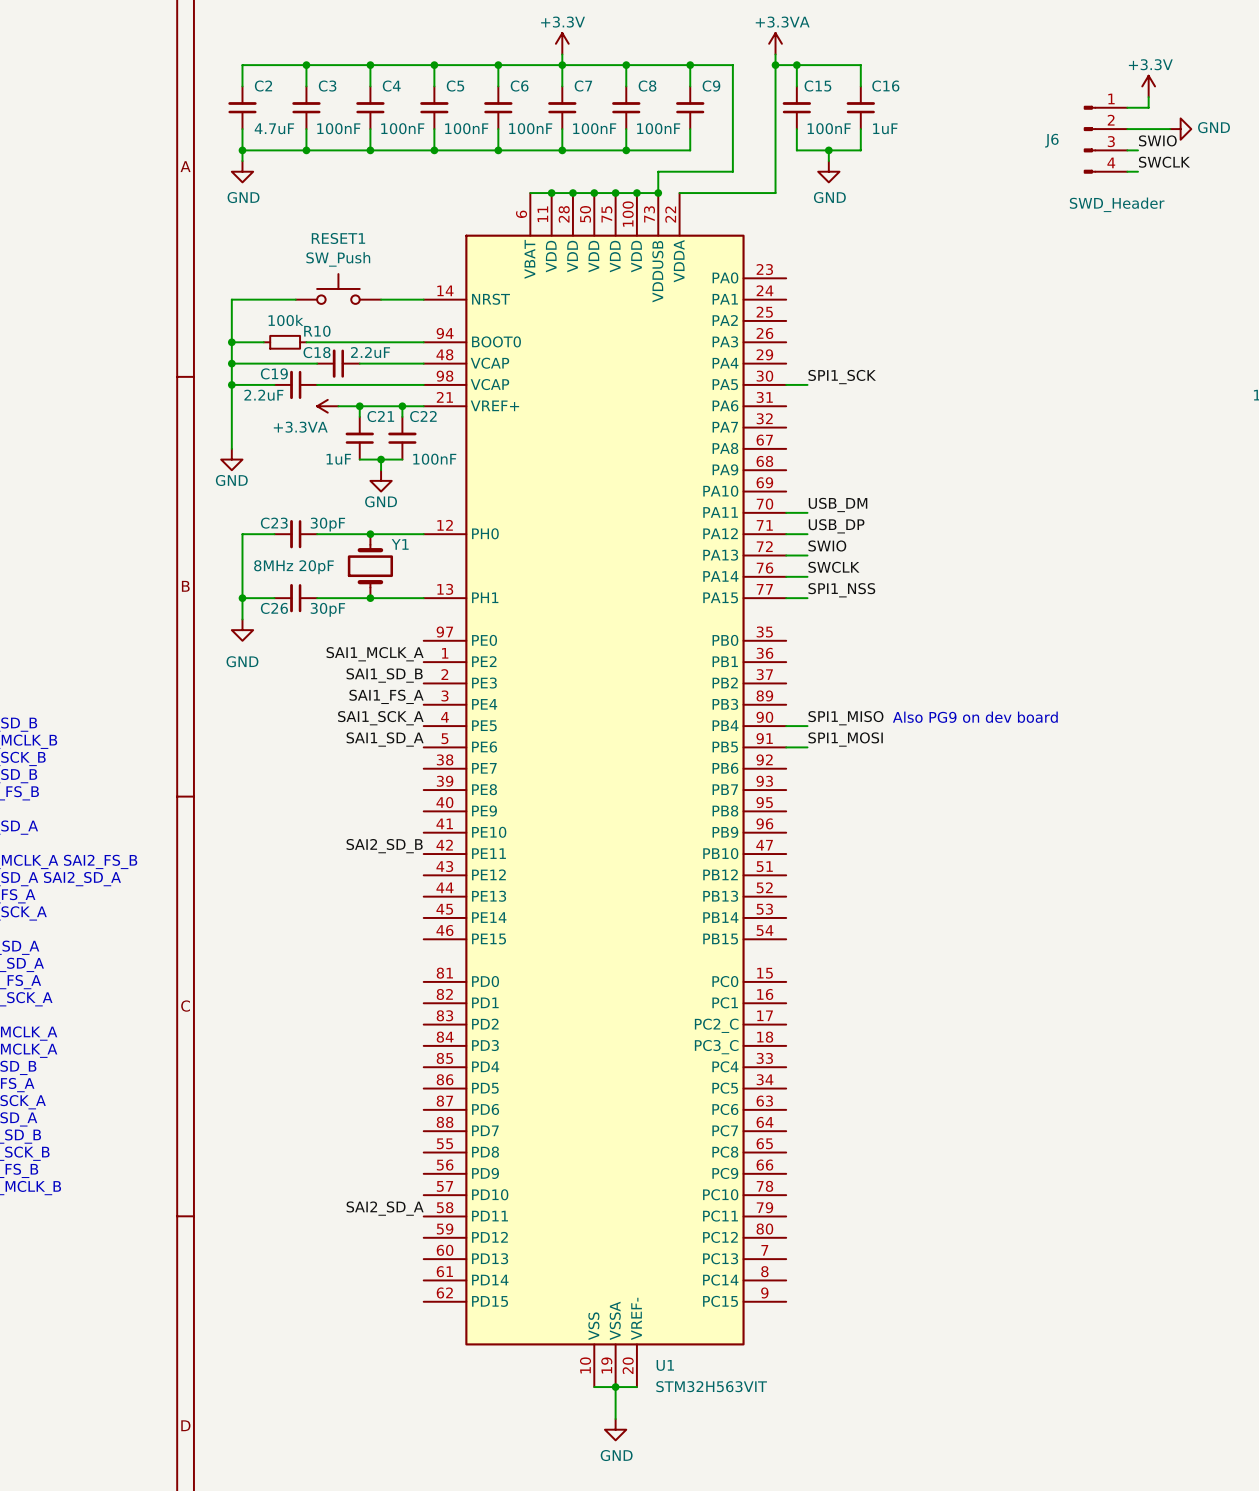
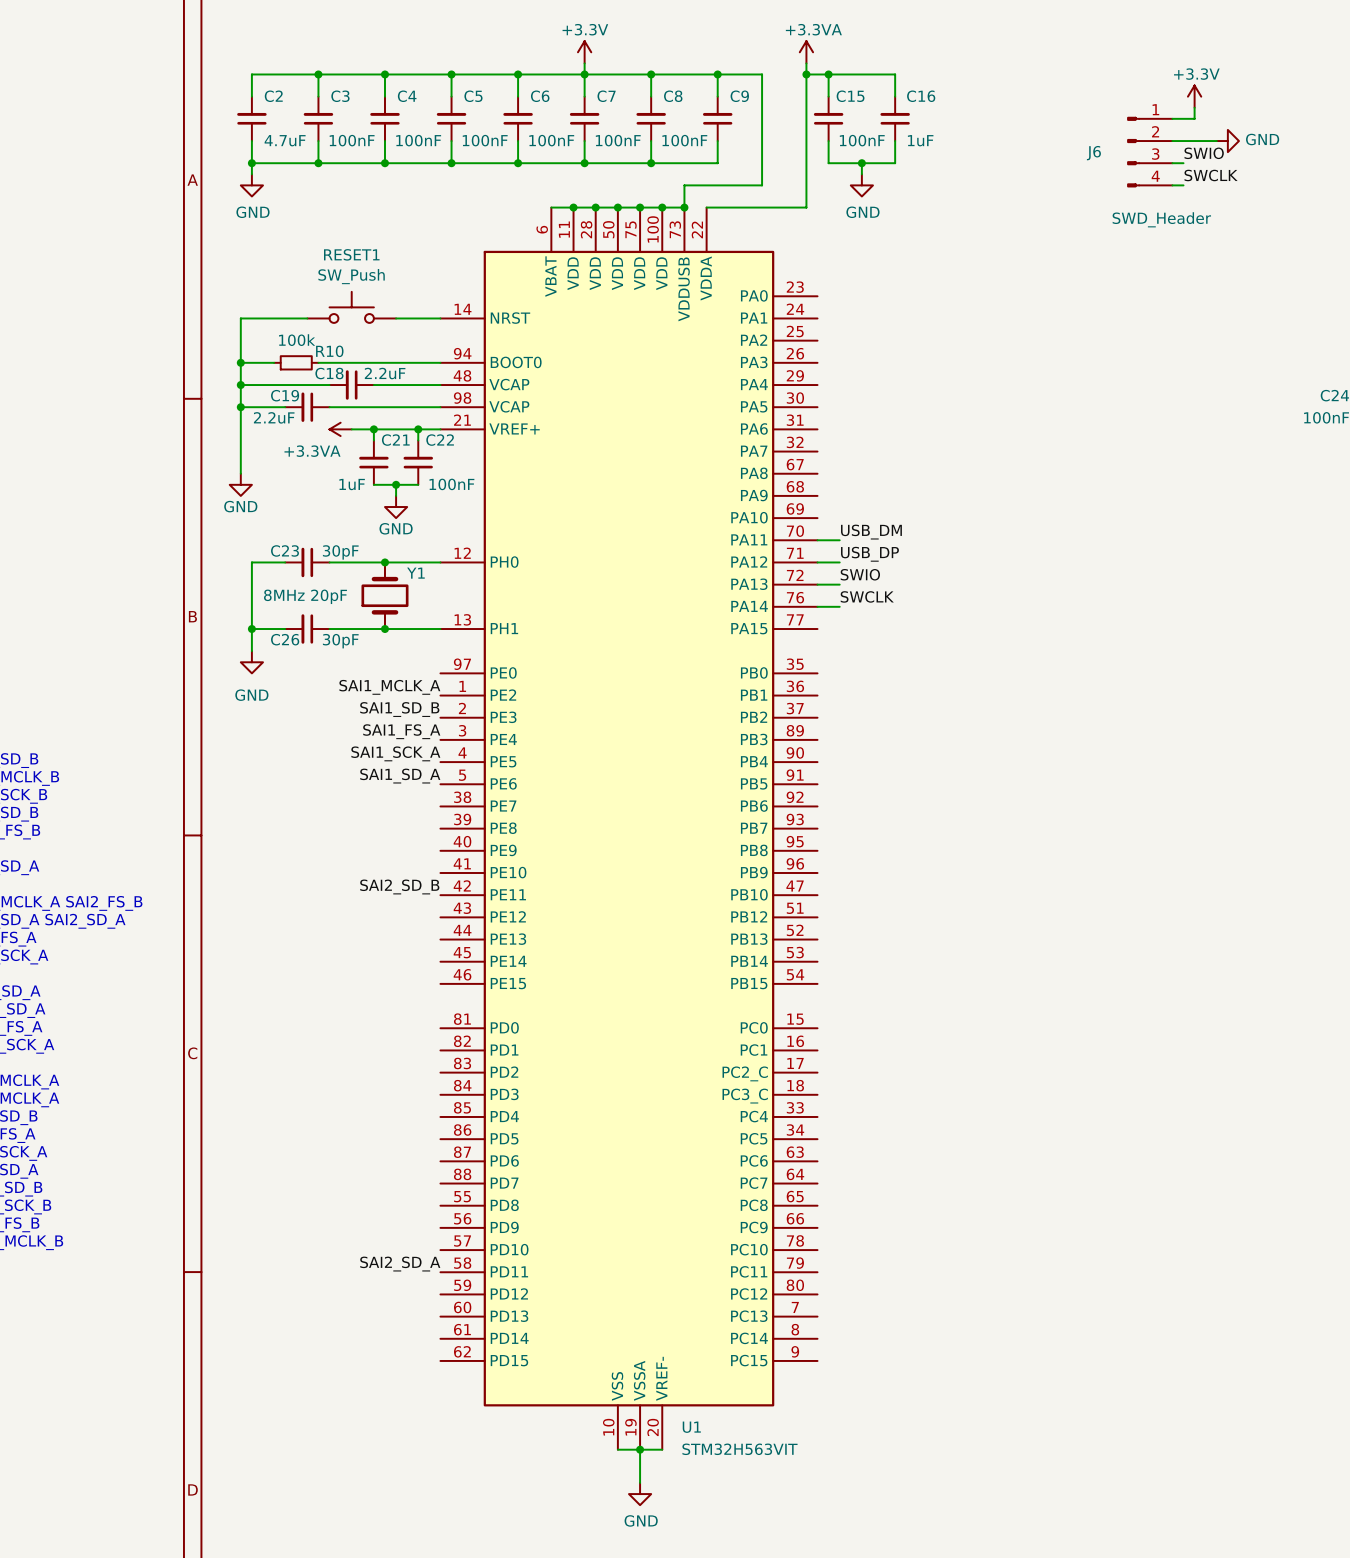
label: SPI1_SCK (842, 377) -> none
wire: (786, 384) (807, 384) -> none
label: SPI1_NSS (841, 590) -> none
wire: (786, 598) (807, 598) -> none
text: Also PG9 on dev board (975, 717) -> none
label: SPI1_MISO (845, 718) -> none
wire: (786, 726) (807, 726) -> none
label: SPI1_MOSI (845, 739) -> none
wire: (786, 747) (807, 747) -> none

